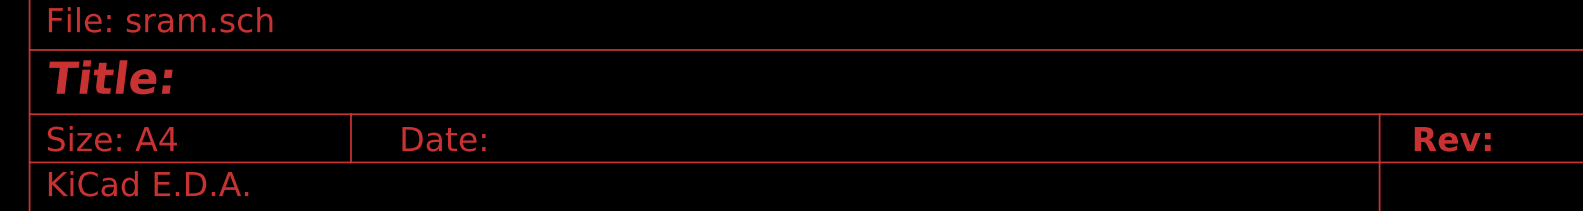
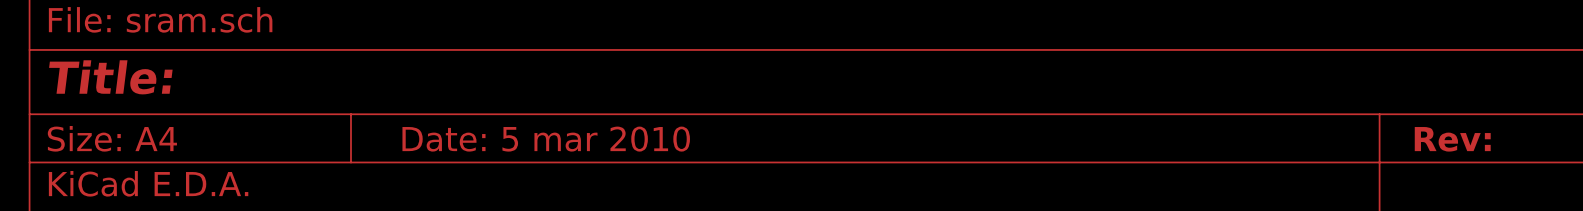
title block: Date: (443, 139) -> Date: 5 mar 2010 (546, 139)

